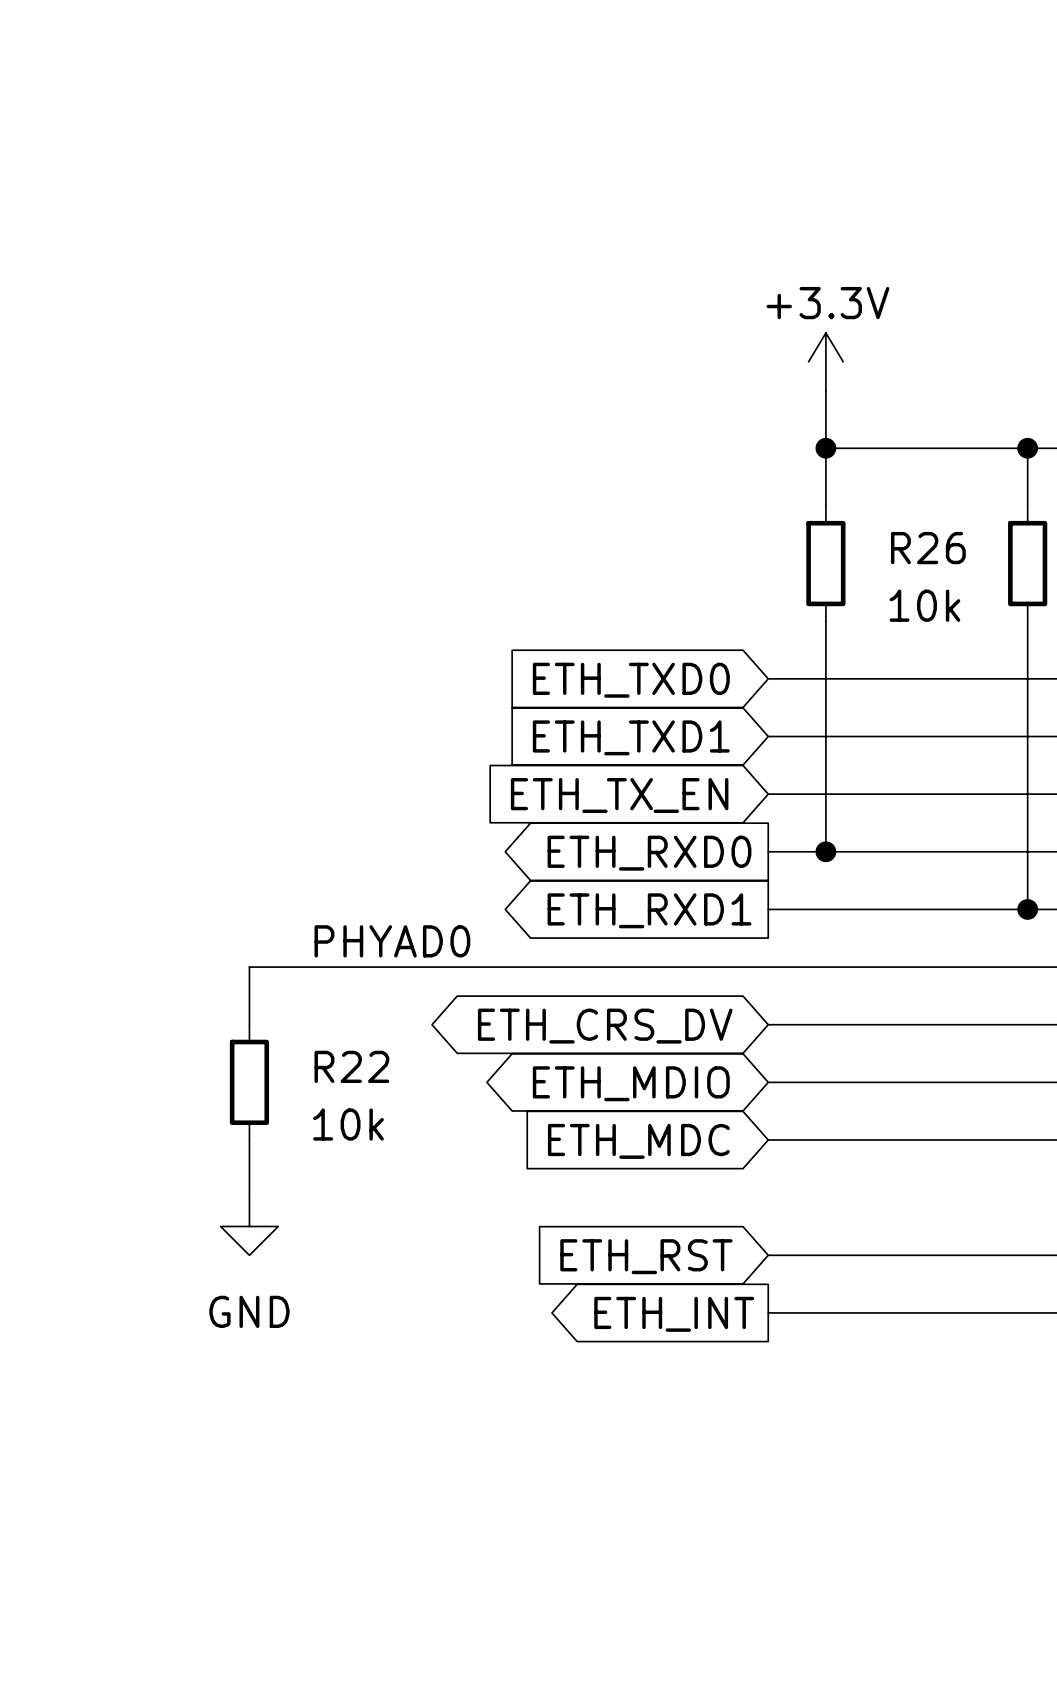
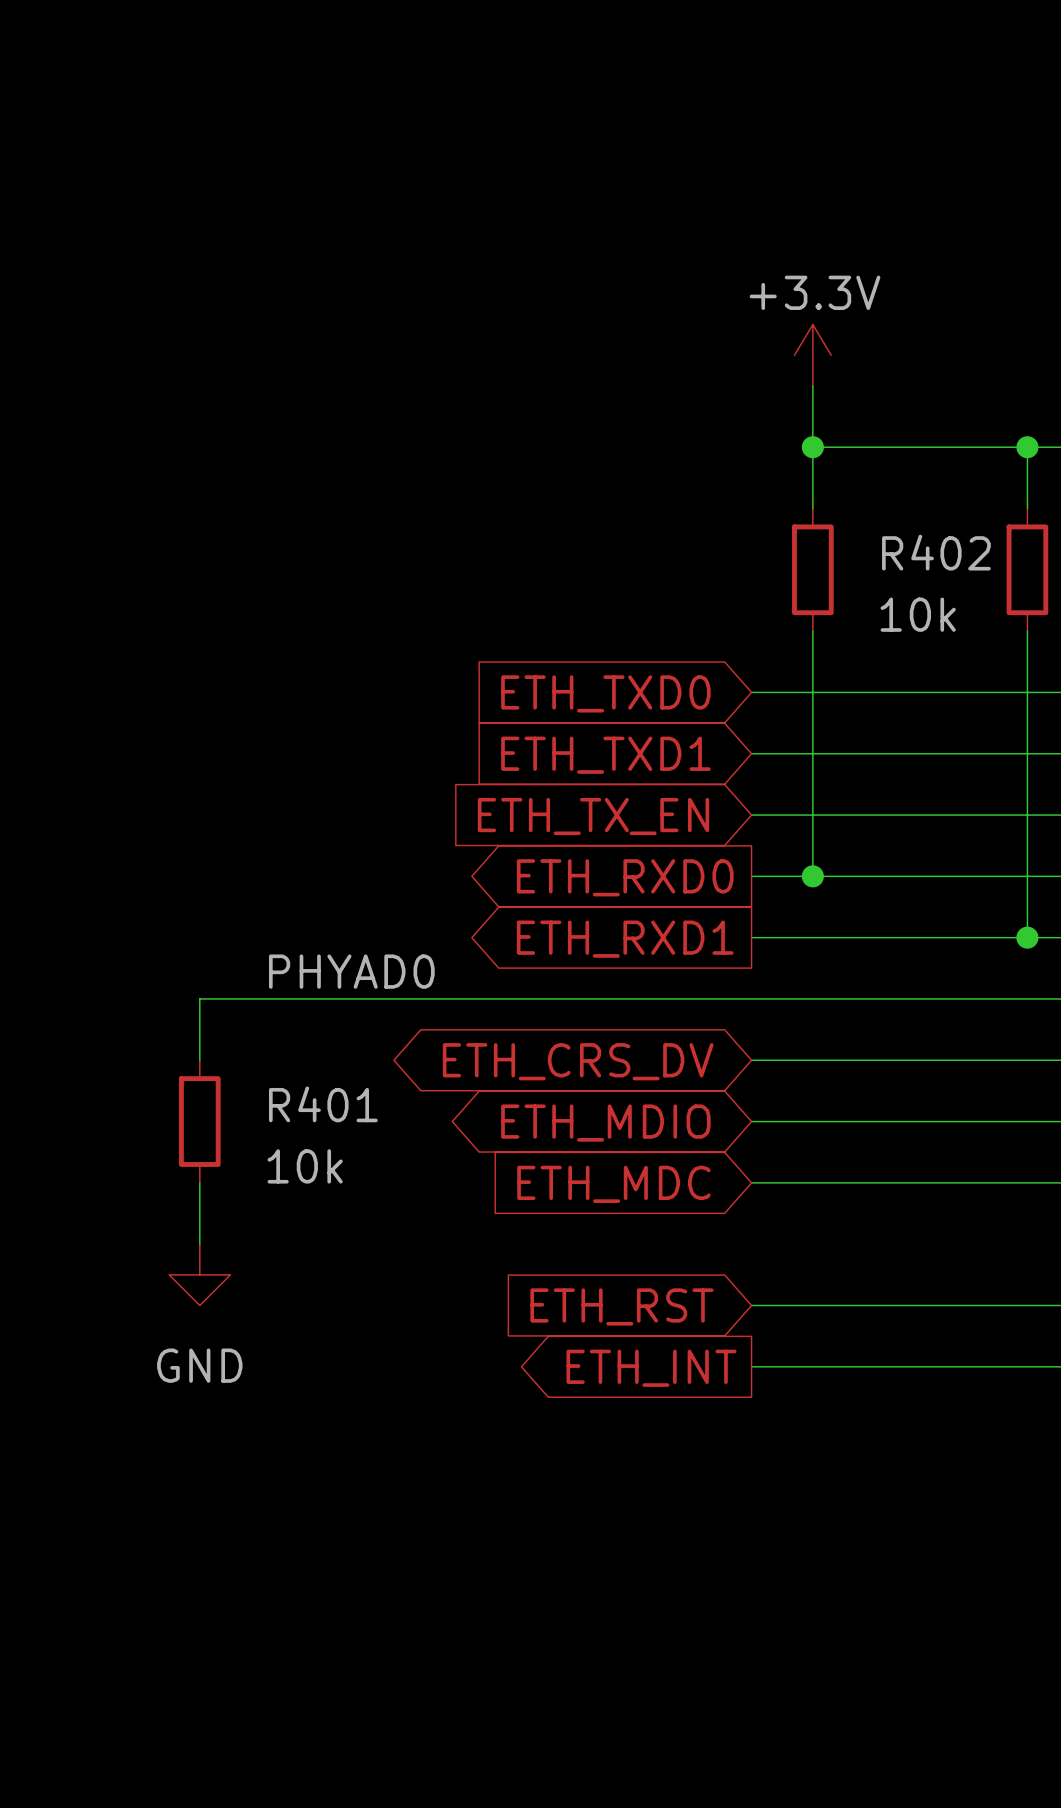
R26 name: R26 (928, 548) -> R402 (936, 552)
R22 name: R22 (351, 1066) -> R401 (323, 1104)

